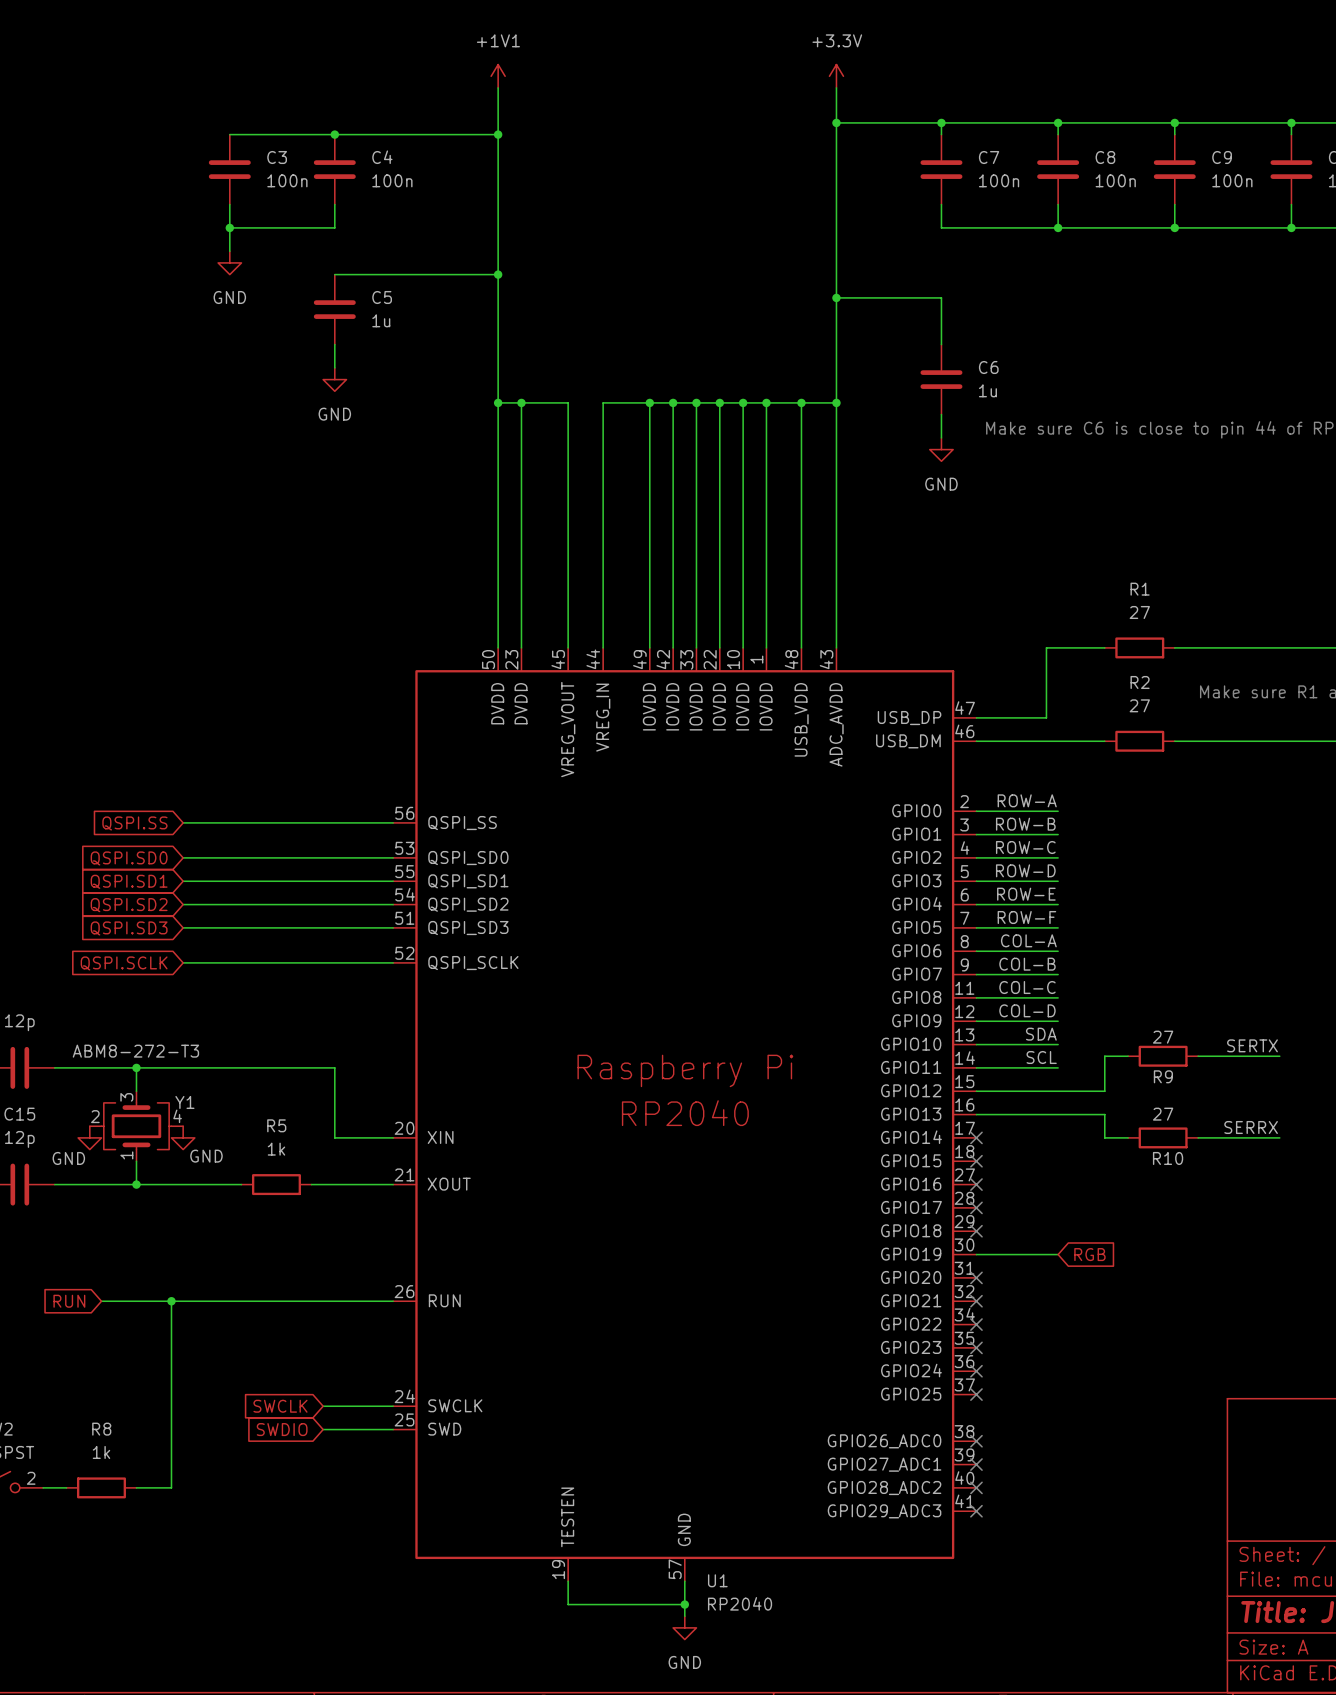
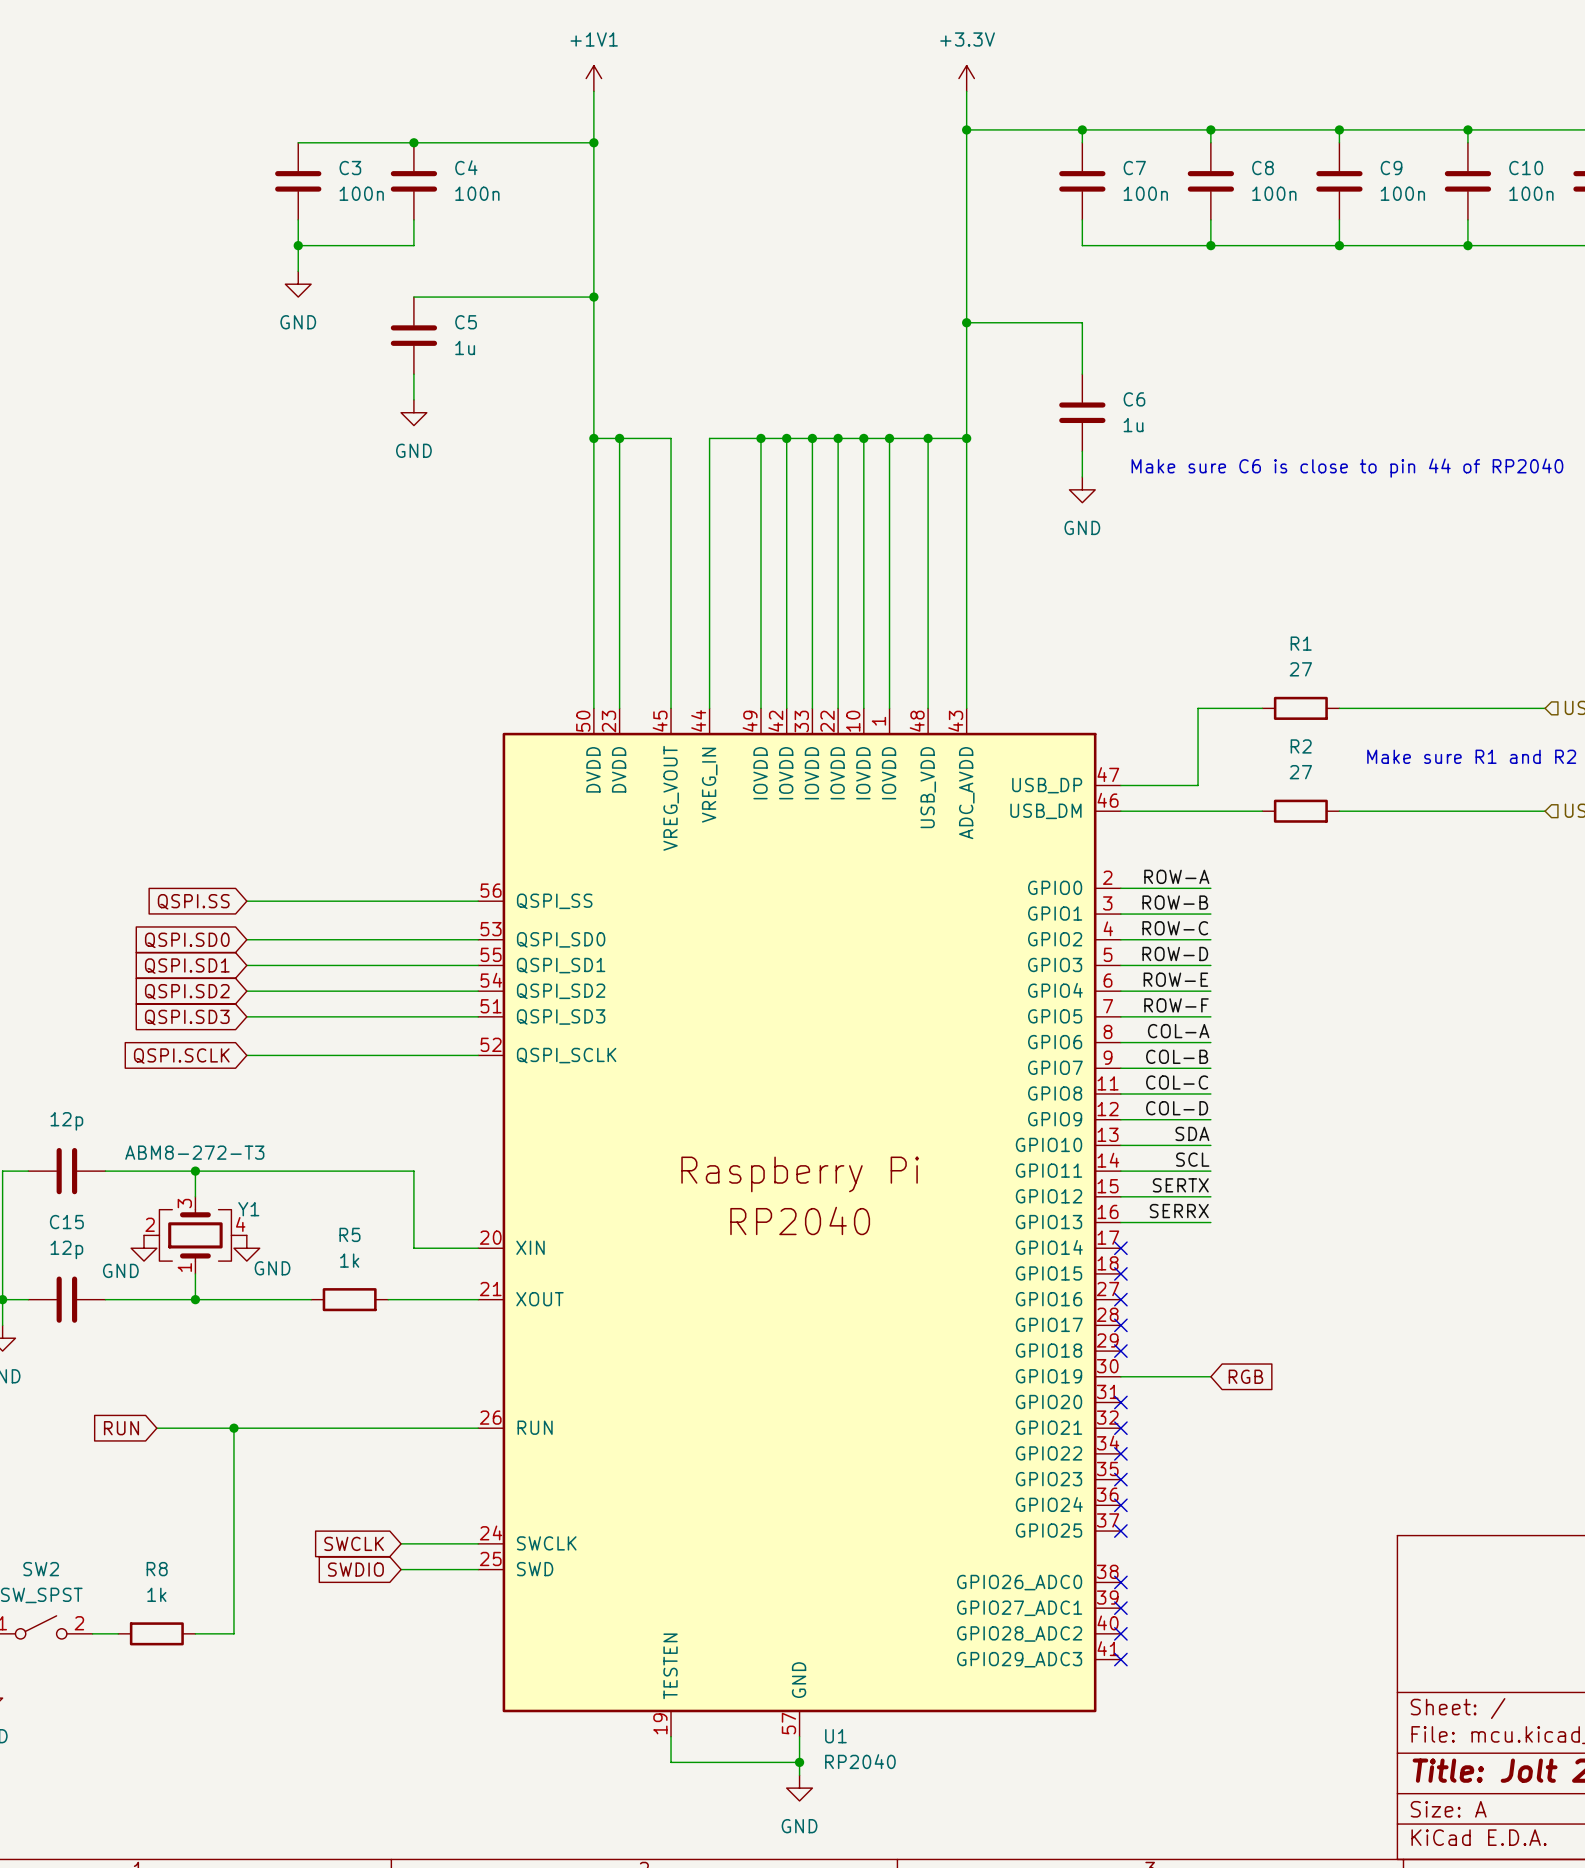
label position: SERTX (1252, 1045) -> SERTX (1180, 1185)
wire: (1128, 1056) (1104, 1056) (1104, 1091) (1058, 1091) -> none
R9: 27 (1163, 1056) -> none
wire: (1198, 1056) (1279, 1056) -> none
wire: (1058, 1114) (1104, 1114) (1104, 1137) (1128, 1137) -> none
label position: SERRX (1251, 1127) -> SERRX (1179, 1211)
R10: 27 (1163, 1137) -> none
wire: (1198, 1137) (1279, 1137) -> none

